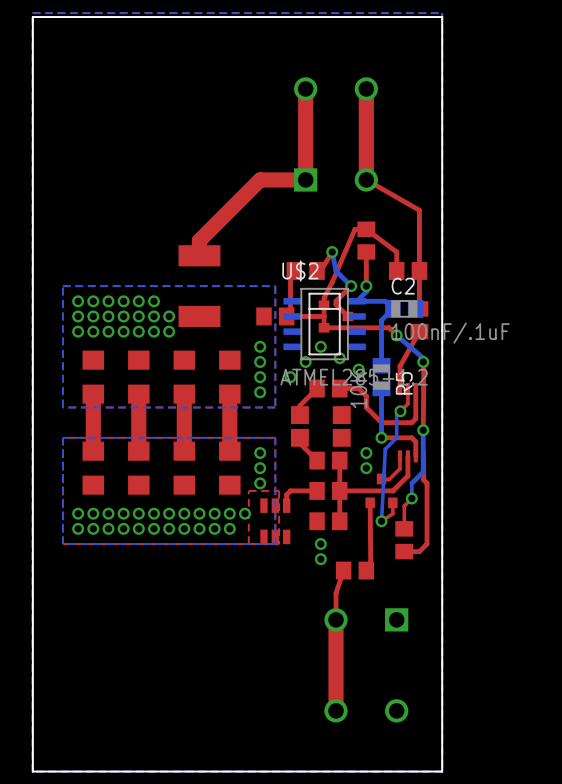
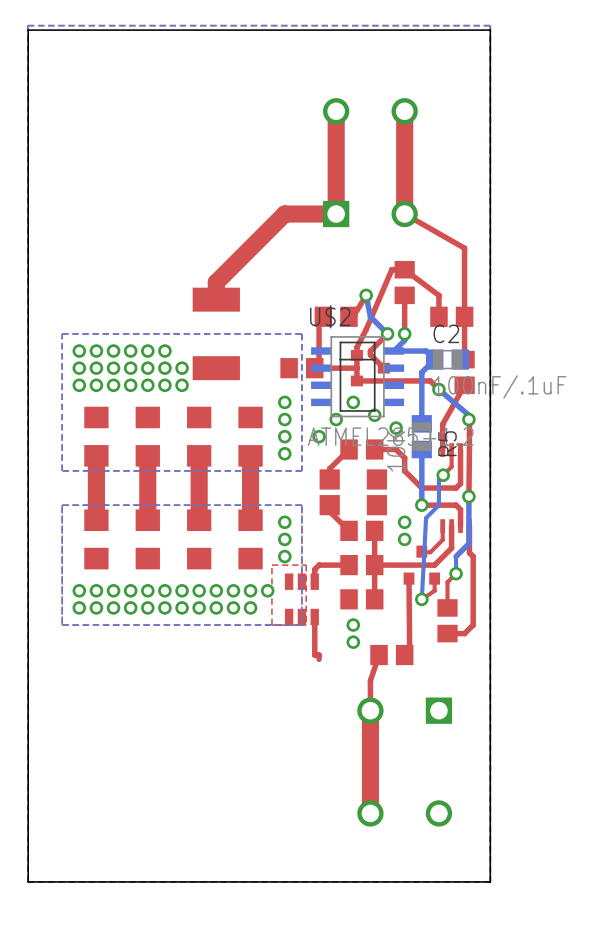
top track: none -> (314, 617) (314, 655) (319, 655) (319, 659)

